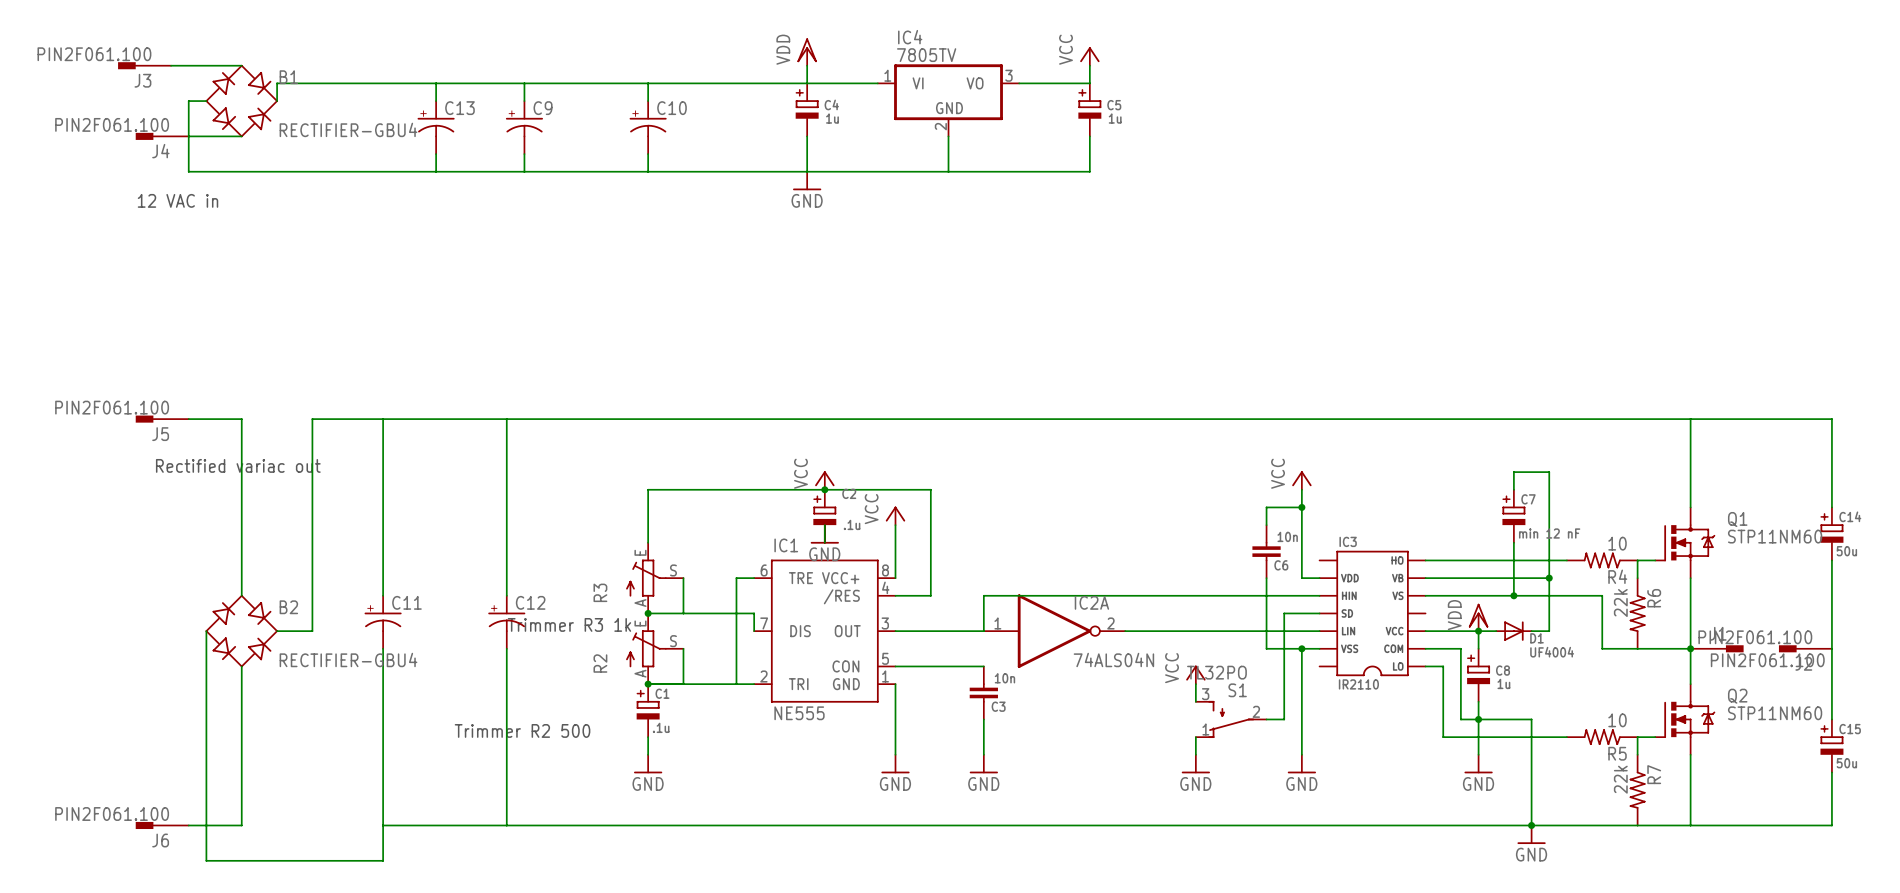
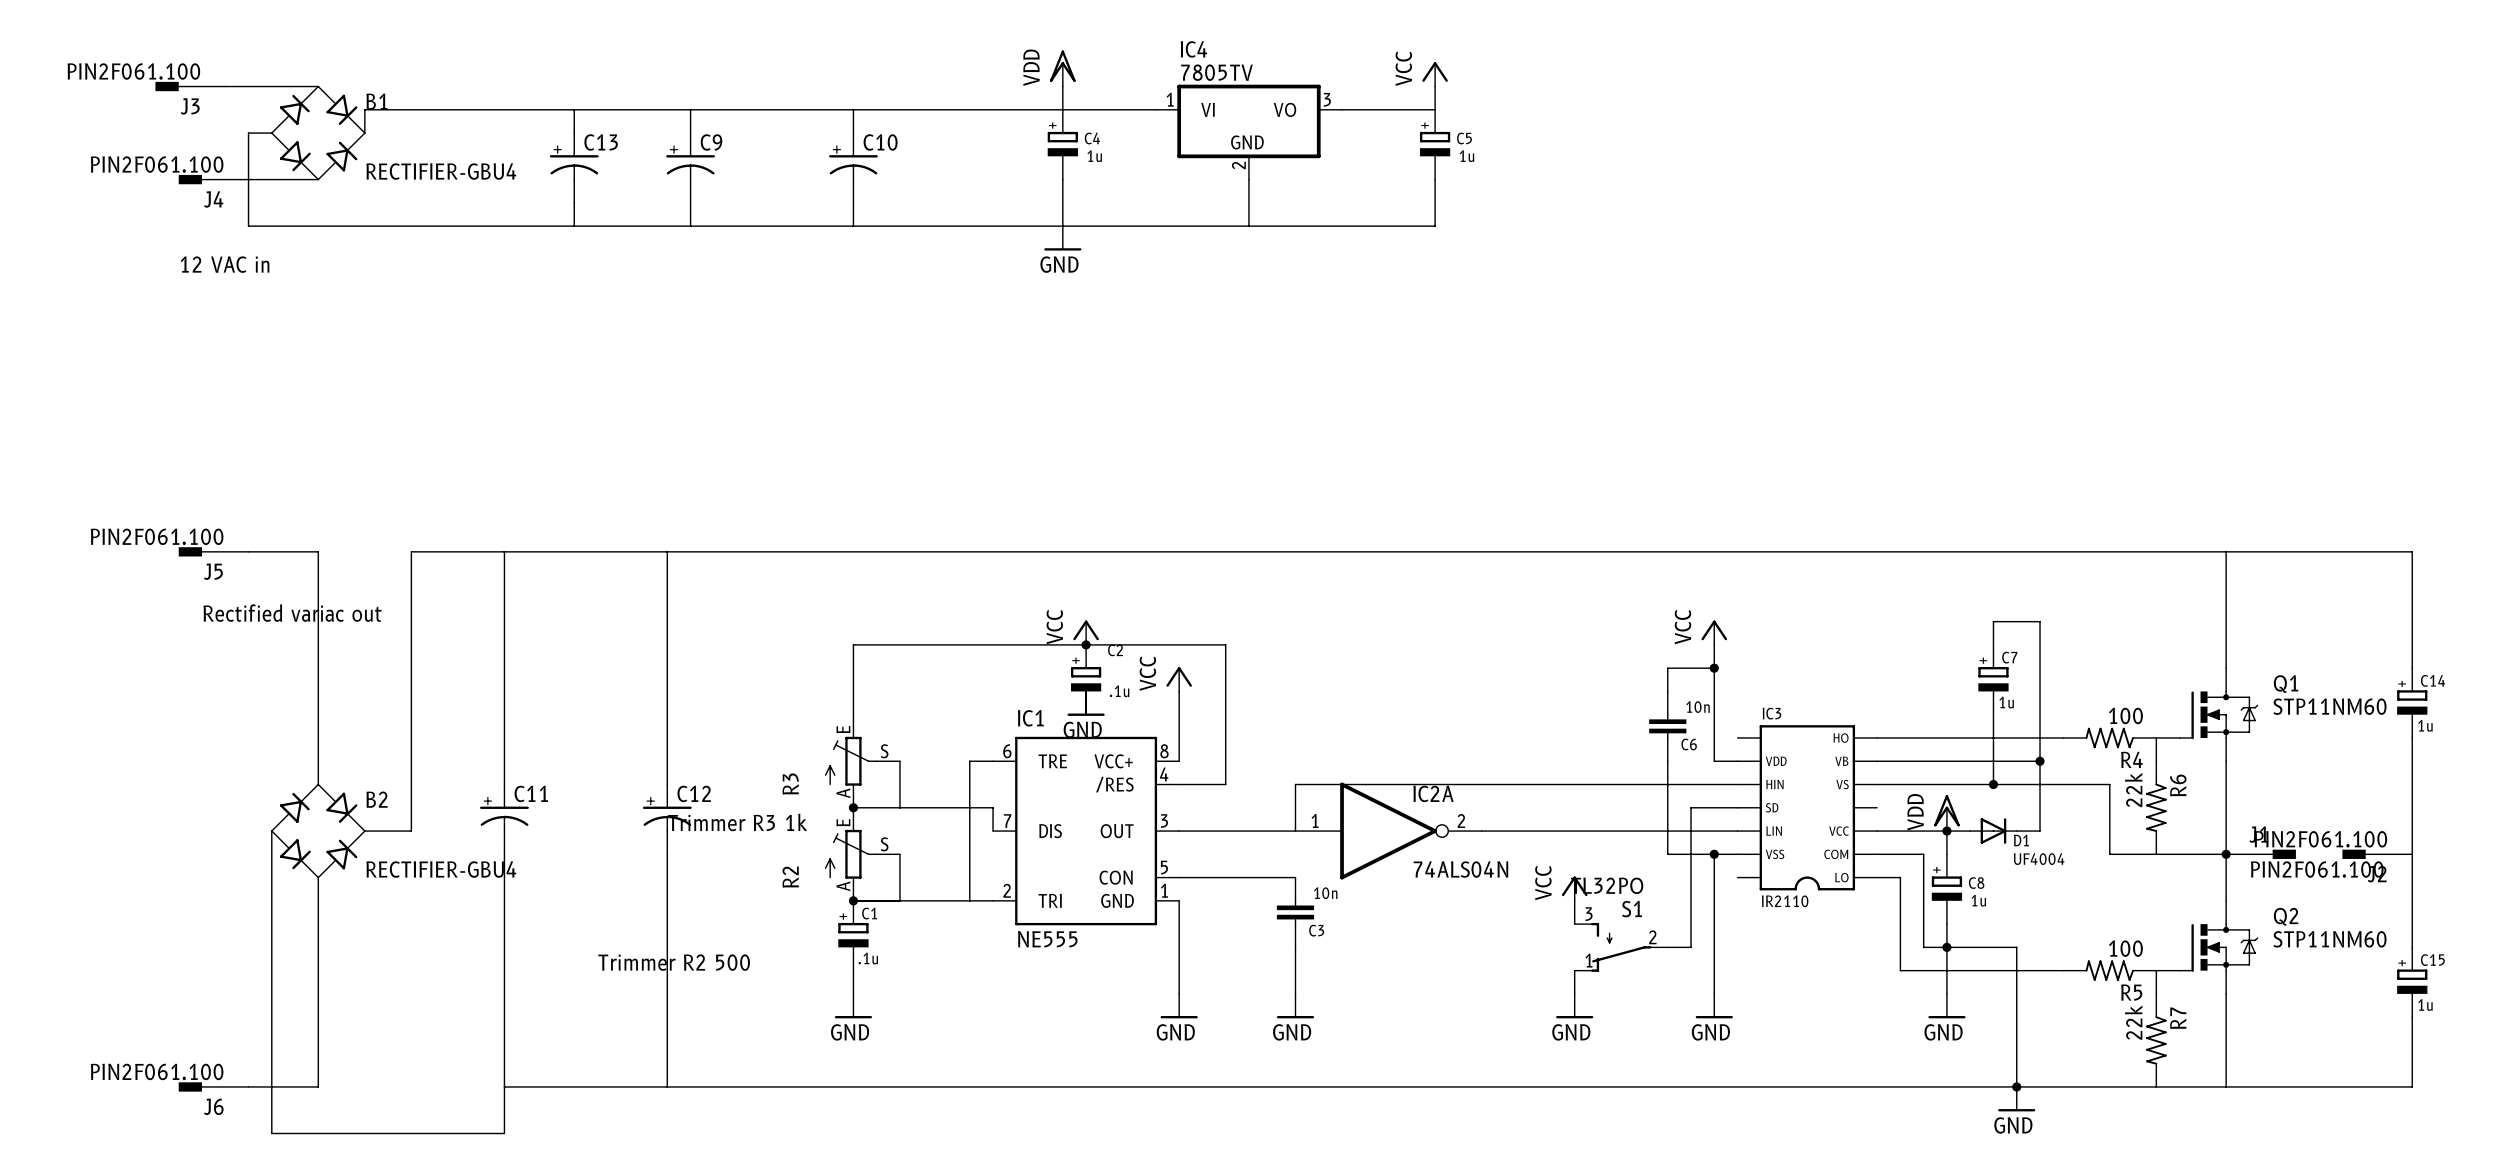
C7 value: min 12 nF (1549, 533) -> 1u (2006, 702)
R4 value: 10 (1617, 543) -> 100 (2125, 715)
C14 value: 50u (1846, 551) -> 1u (2425, 725)
R5 value: 10 (1617, 720) -> 100 (2125, 948)
C15 value: 50u (1846, 763) -> 1u (2425, 1005)

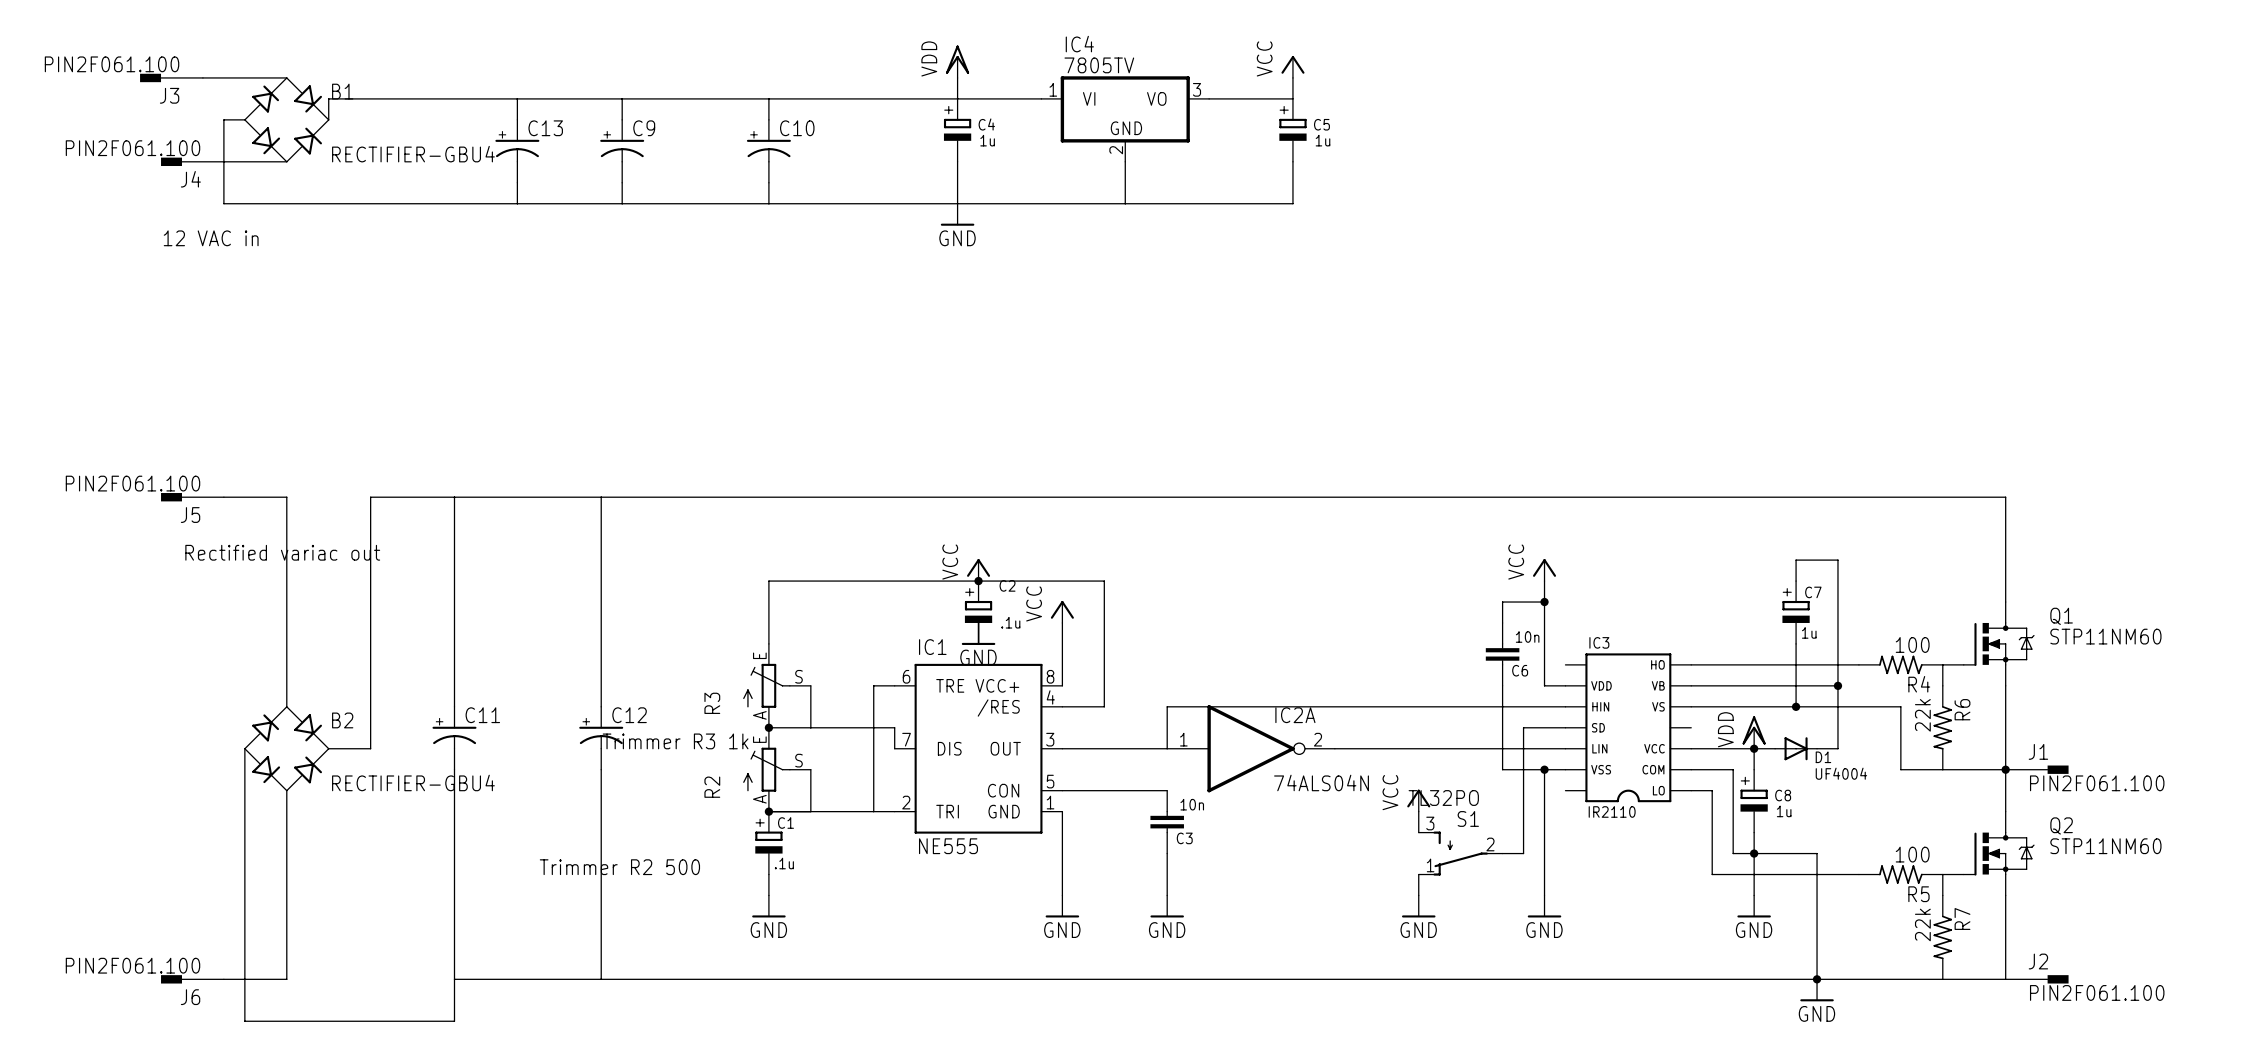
wire: (2226, 551) (2412, 551) (2412, 668) -> none
C14: 1u (2412, 703) -> none
wire: (2412, 737) (2412, 947) -> none
J2 rotation: 0° (2354, 854) -> 180° (2058, 979)
J2 position: (2377, 854) -> (2037, 979)
C15: 1u (2412, 982) -> none
wire: (2412, 1017) (2412, 1086) (2226, 1086) -> none

